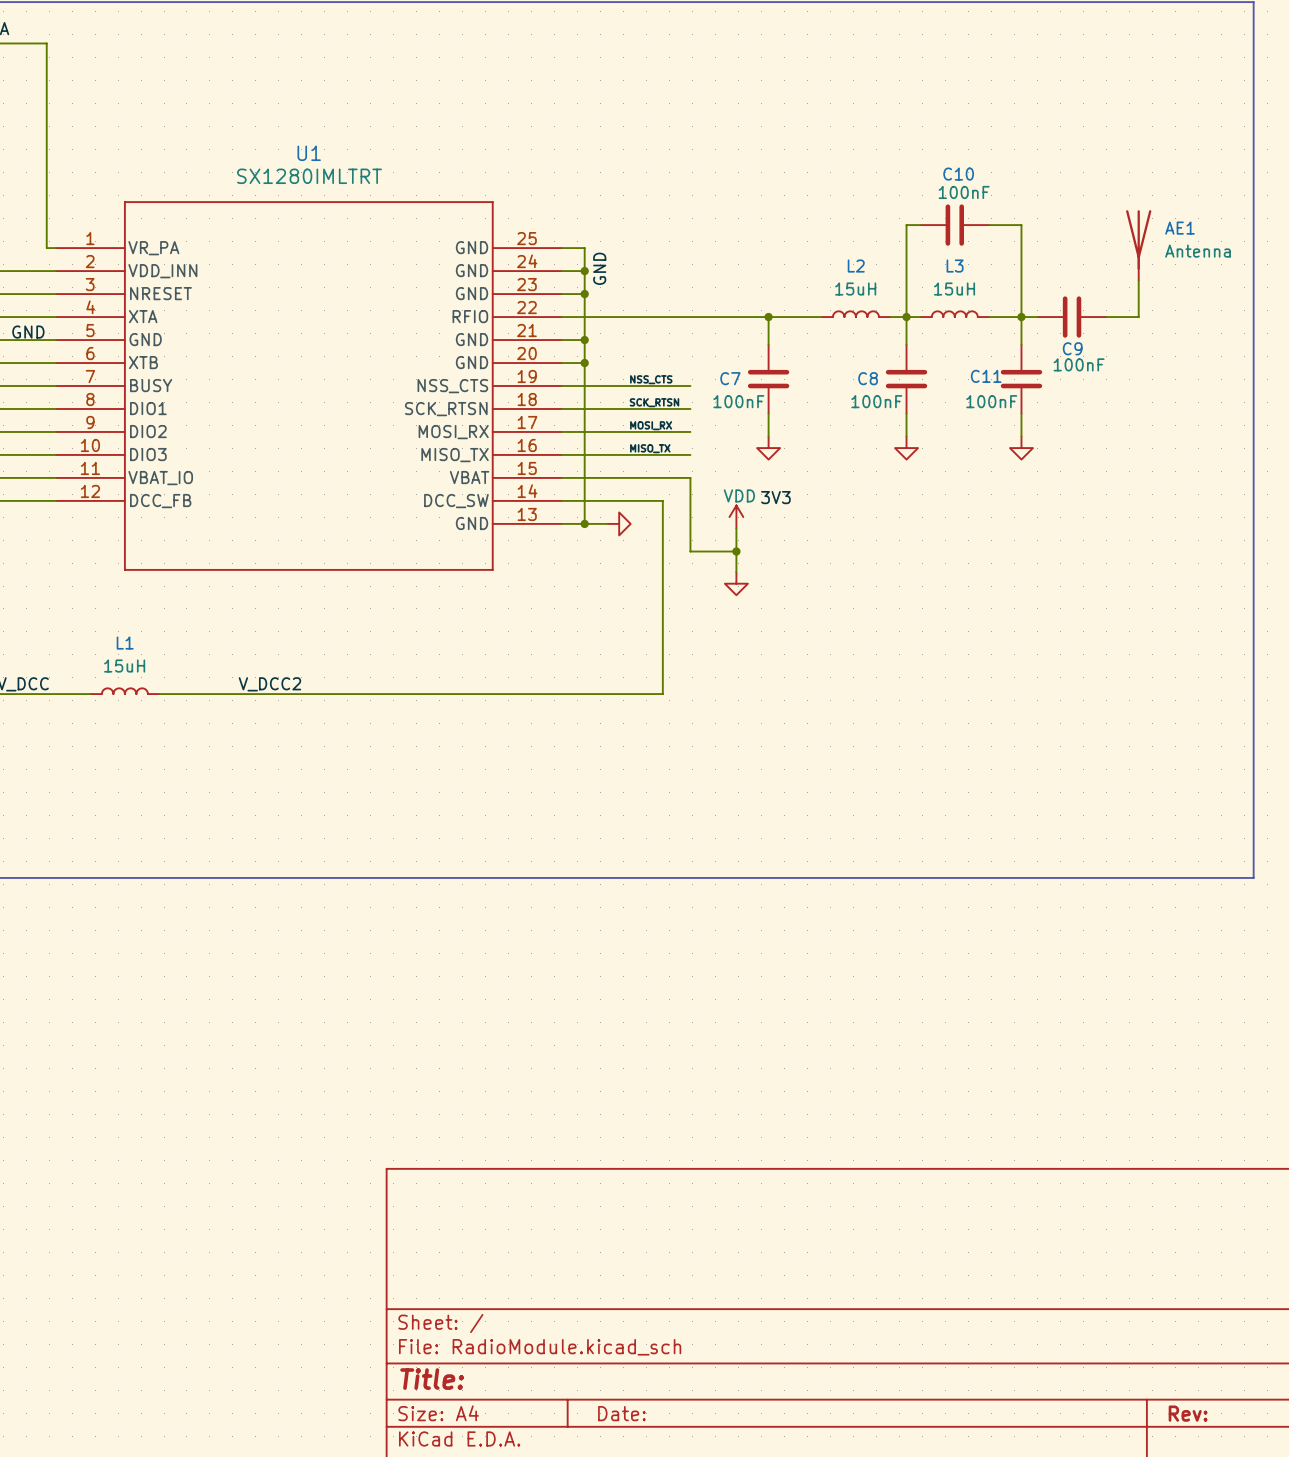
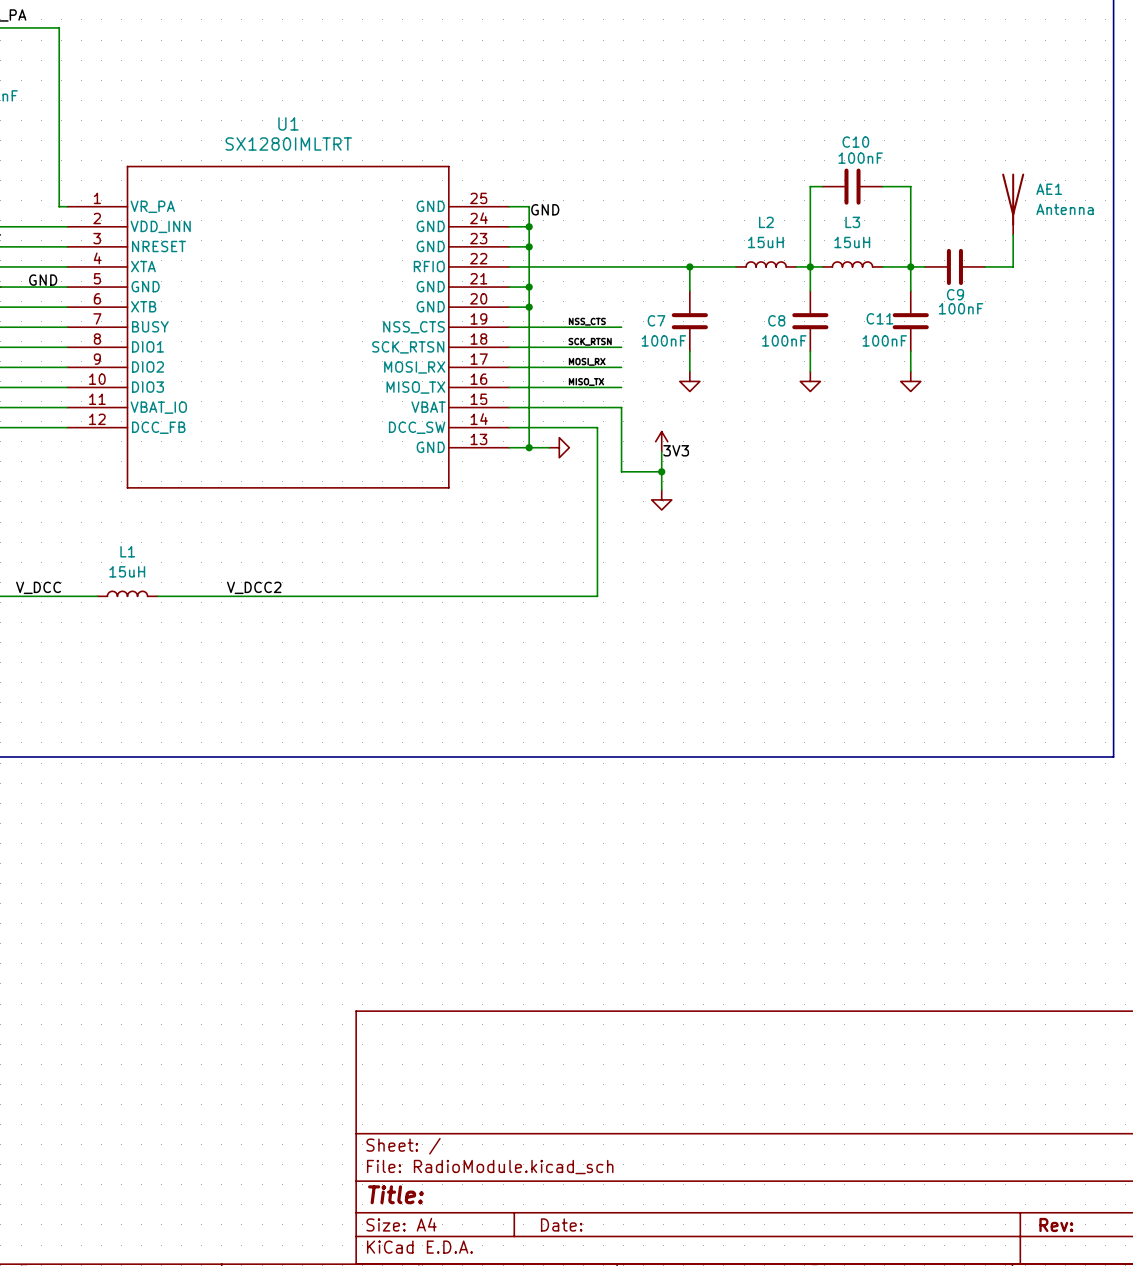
label rotation: 0° (599, 268) -> 90° clockwise (545, 209)
power symbol text: VDD (739, 495) -> none
label position: 3V3 (775, 497) -> 3V3 (676, 450)

